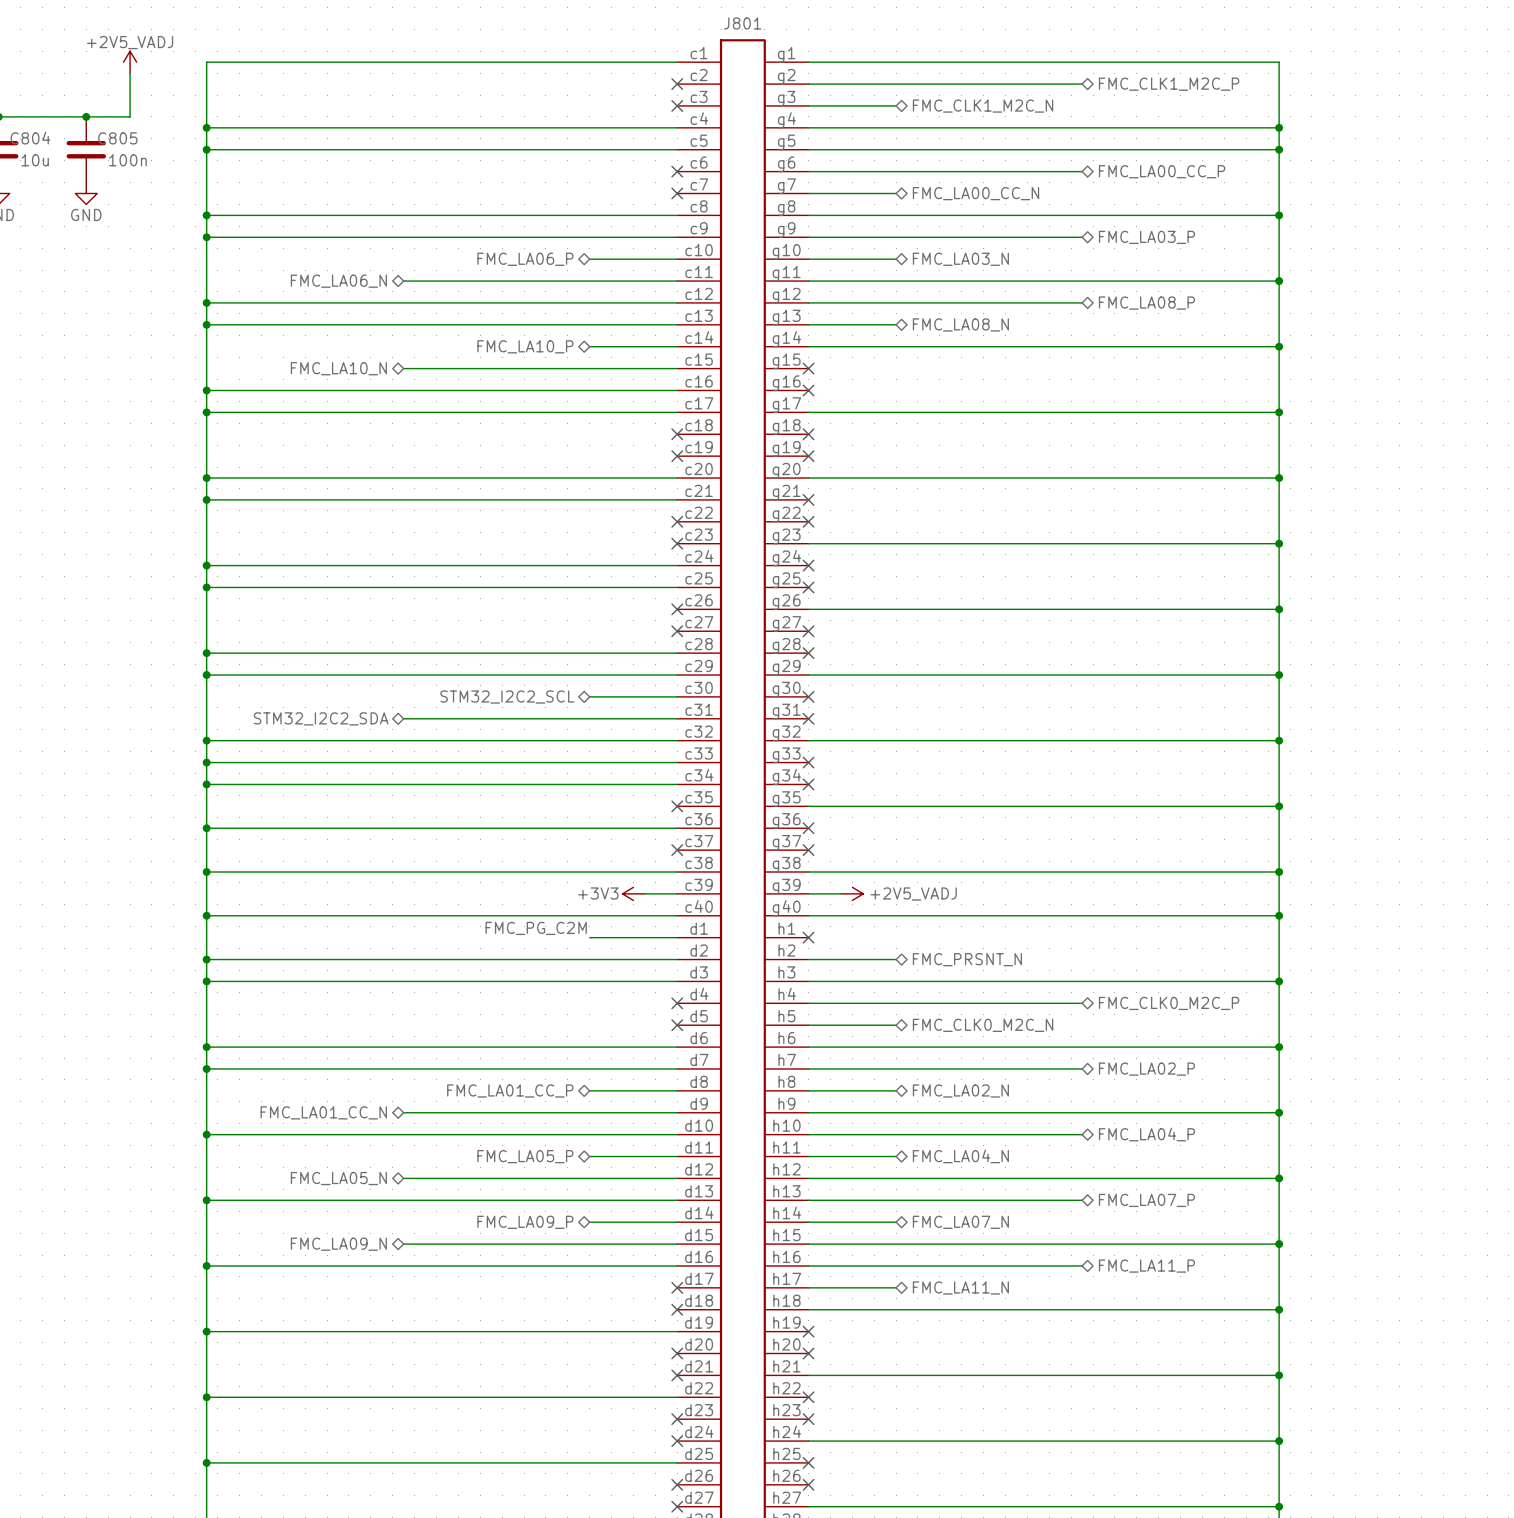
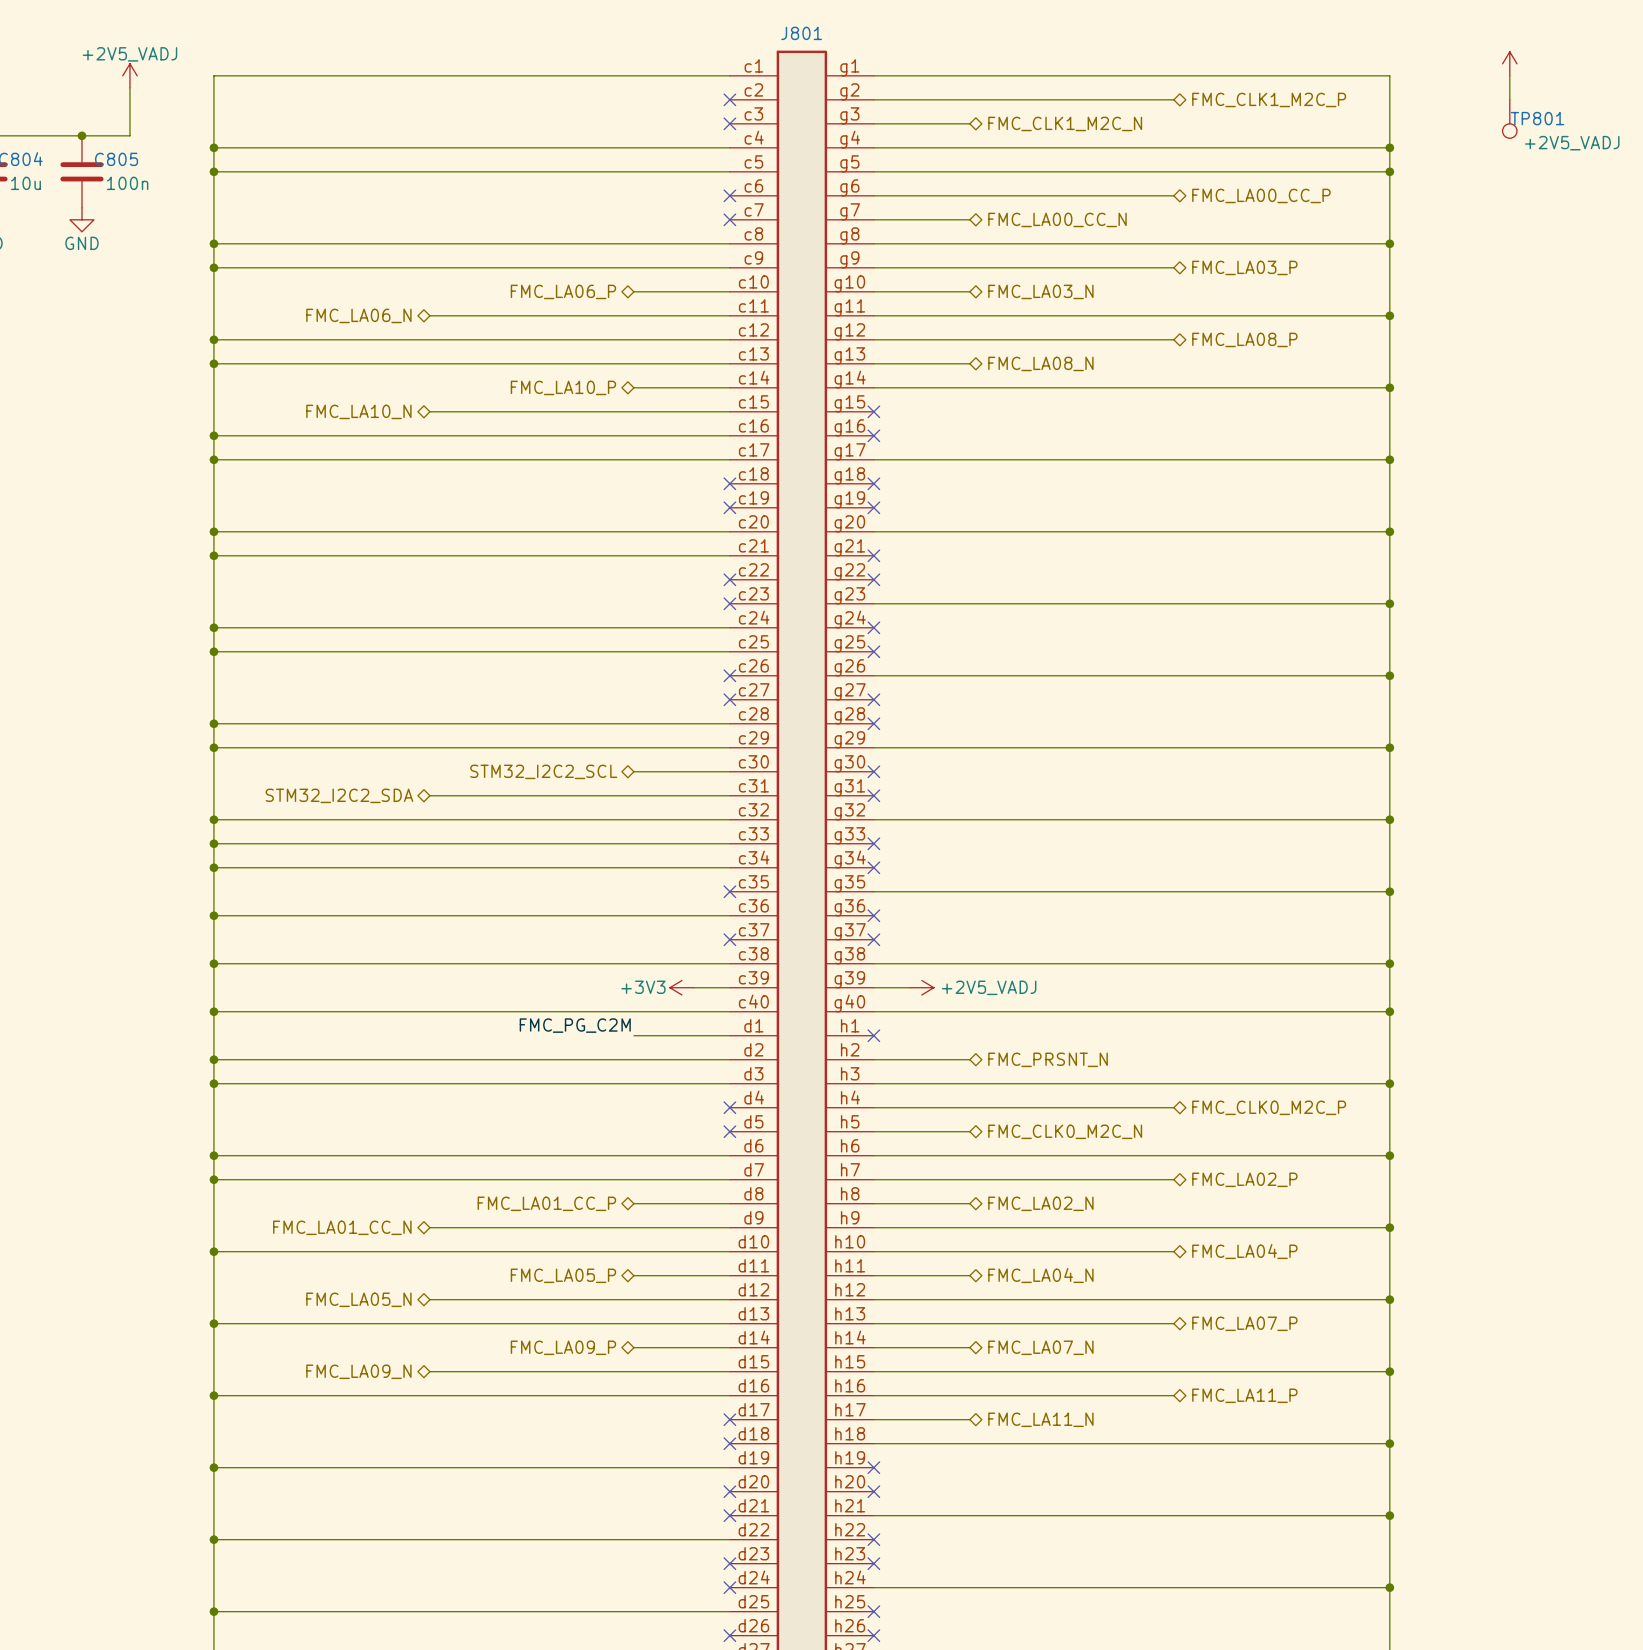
power symbol: none -> (1509, 63)
wire: none -> (1509, 75) (1509, 99)
TP801: none -> +2V5_VADJ (1509, 119)

